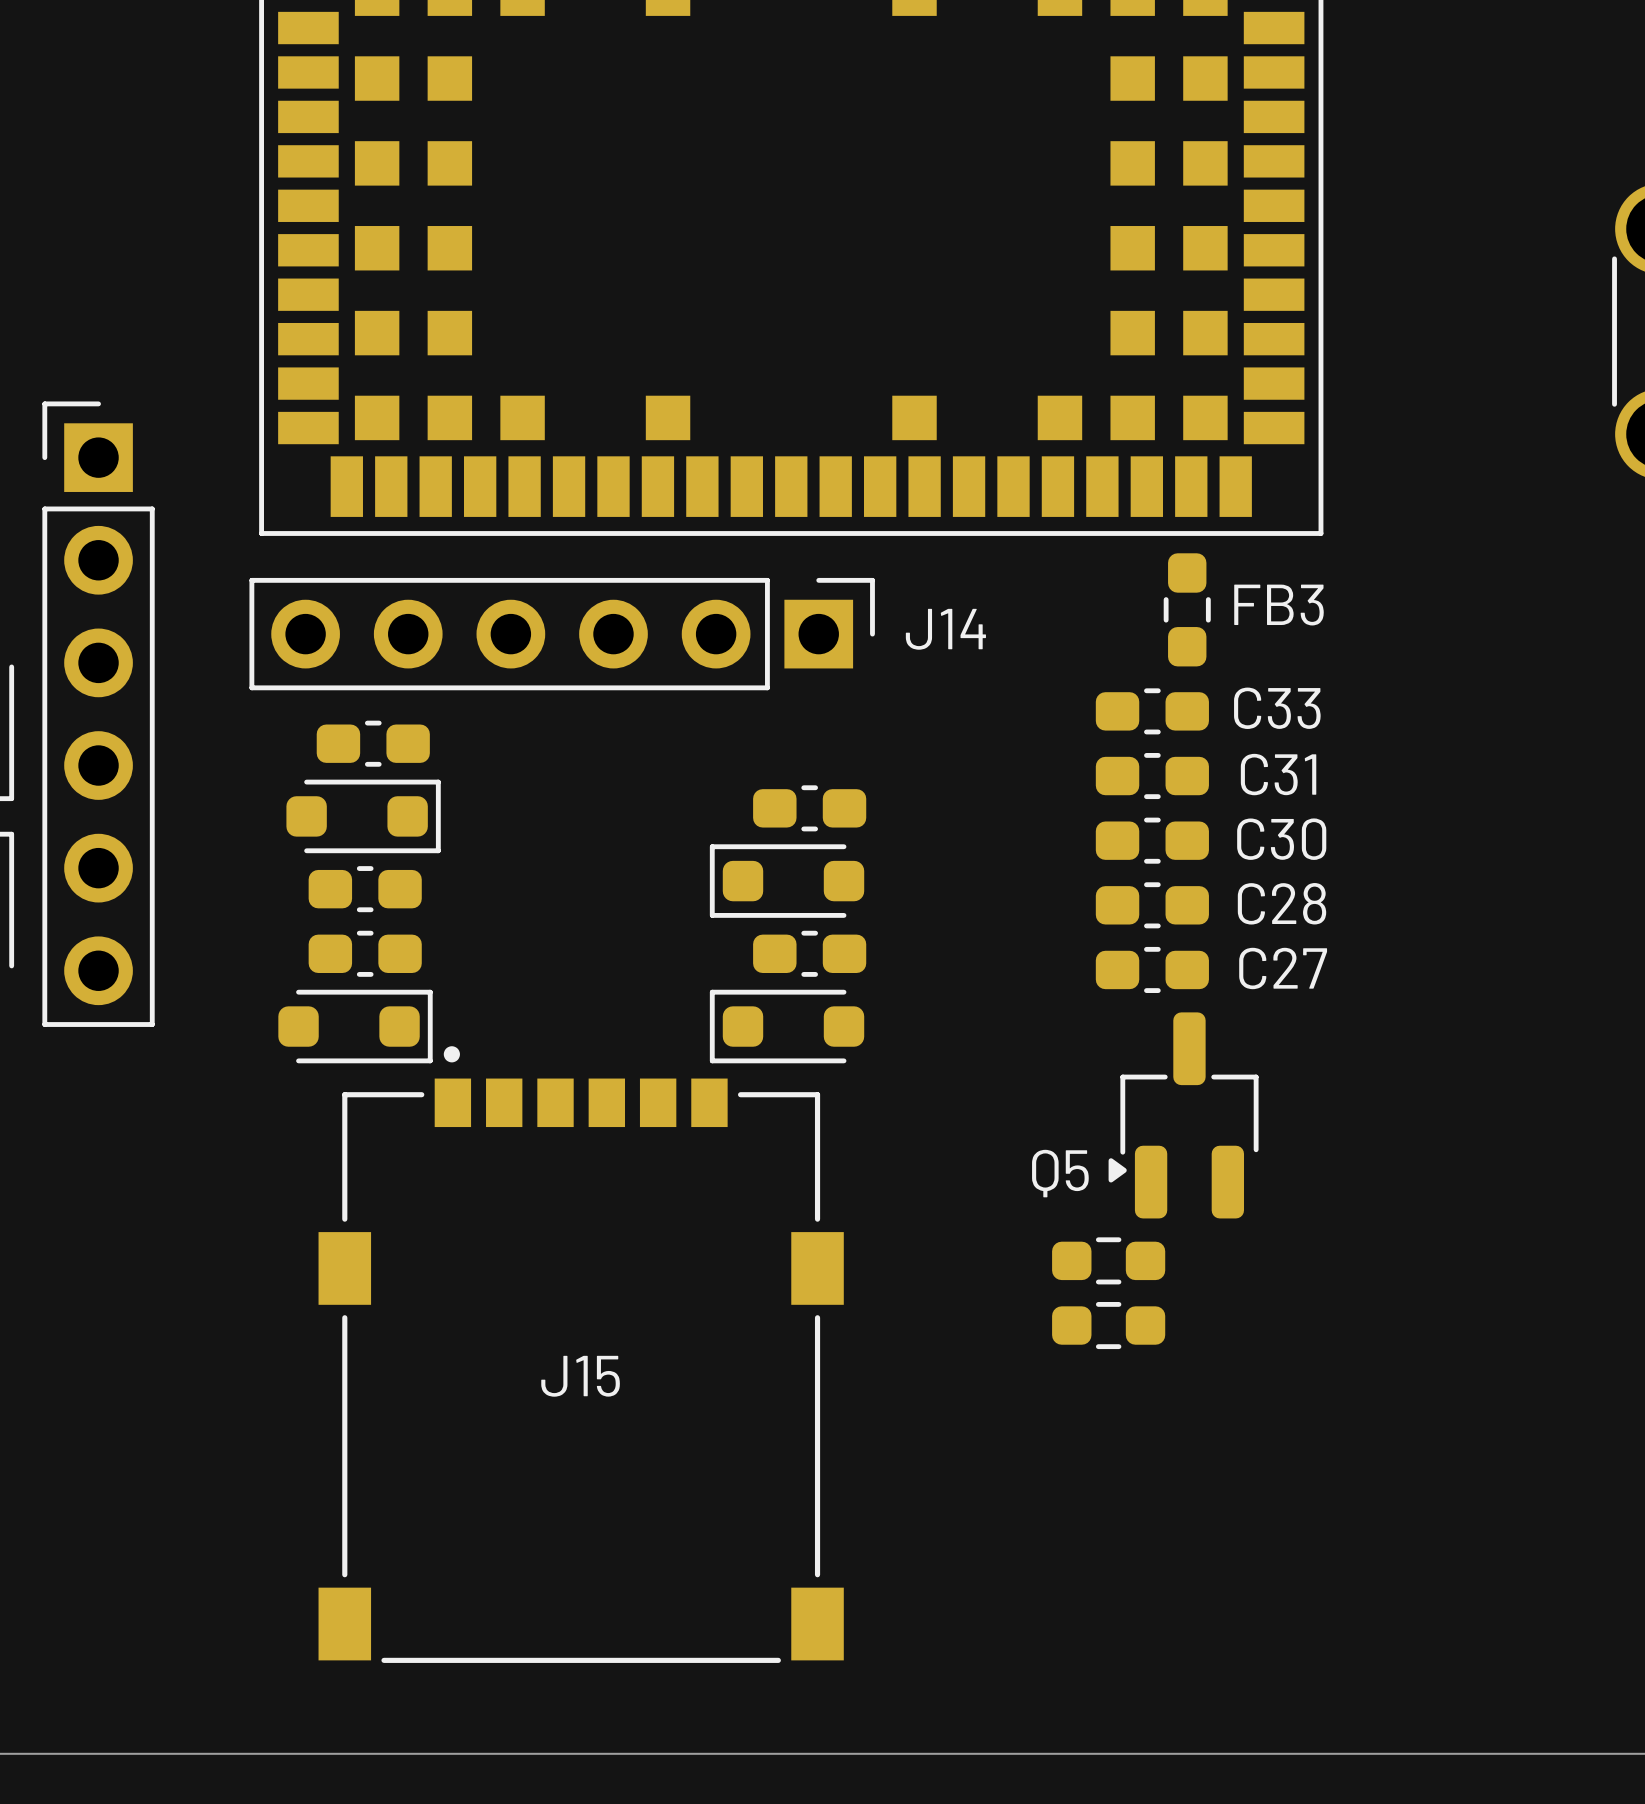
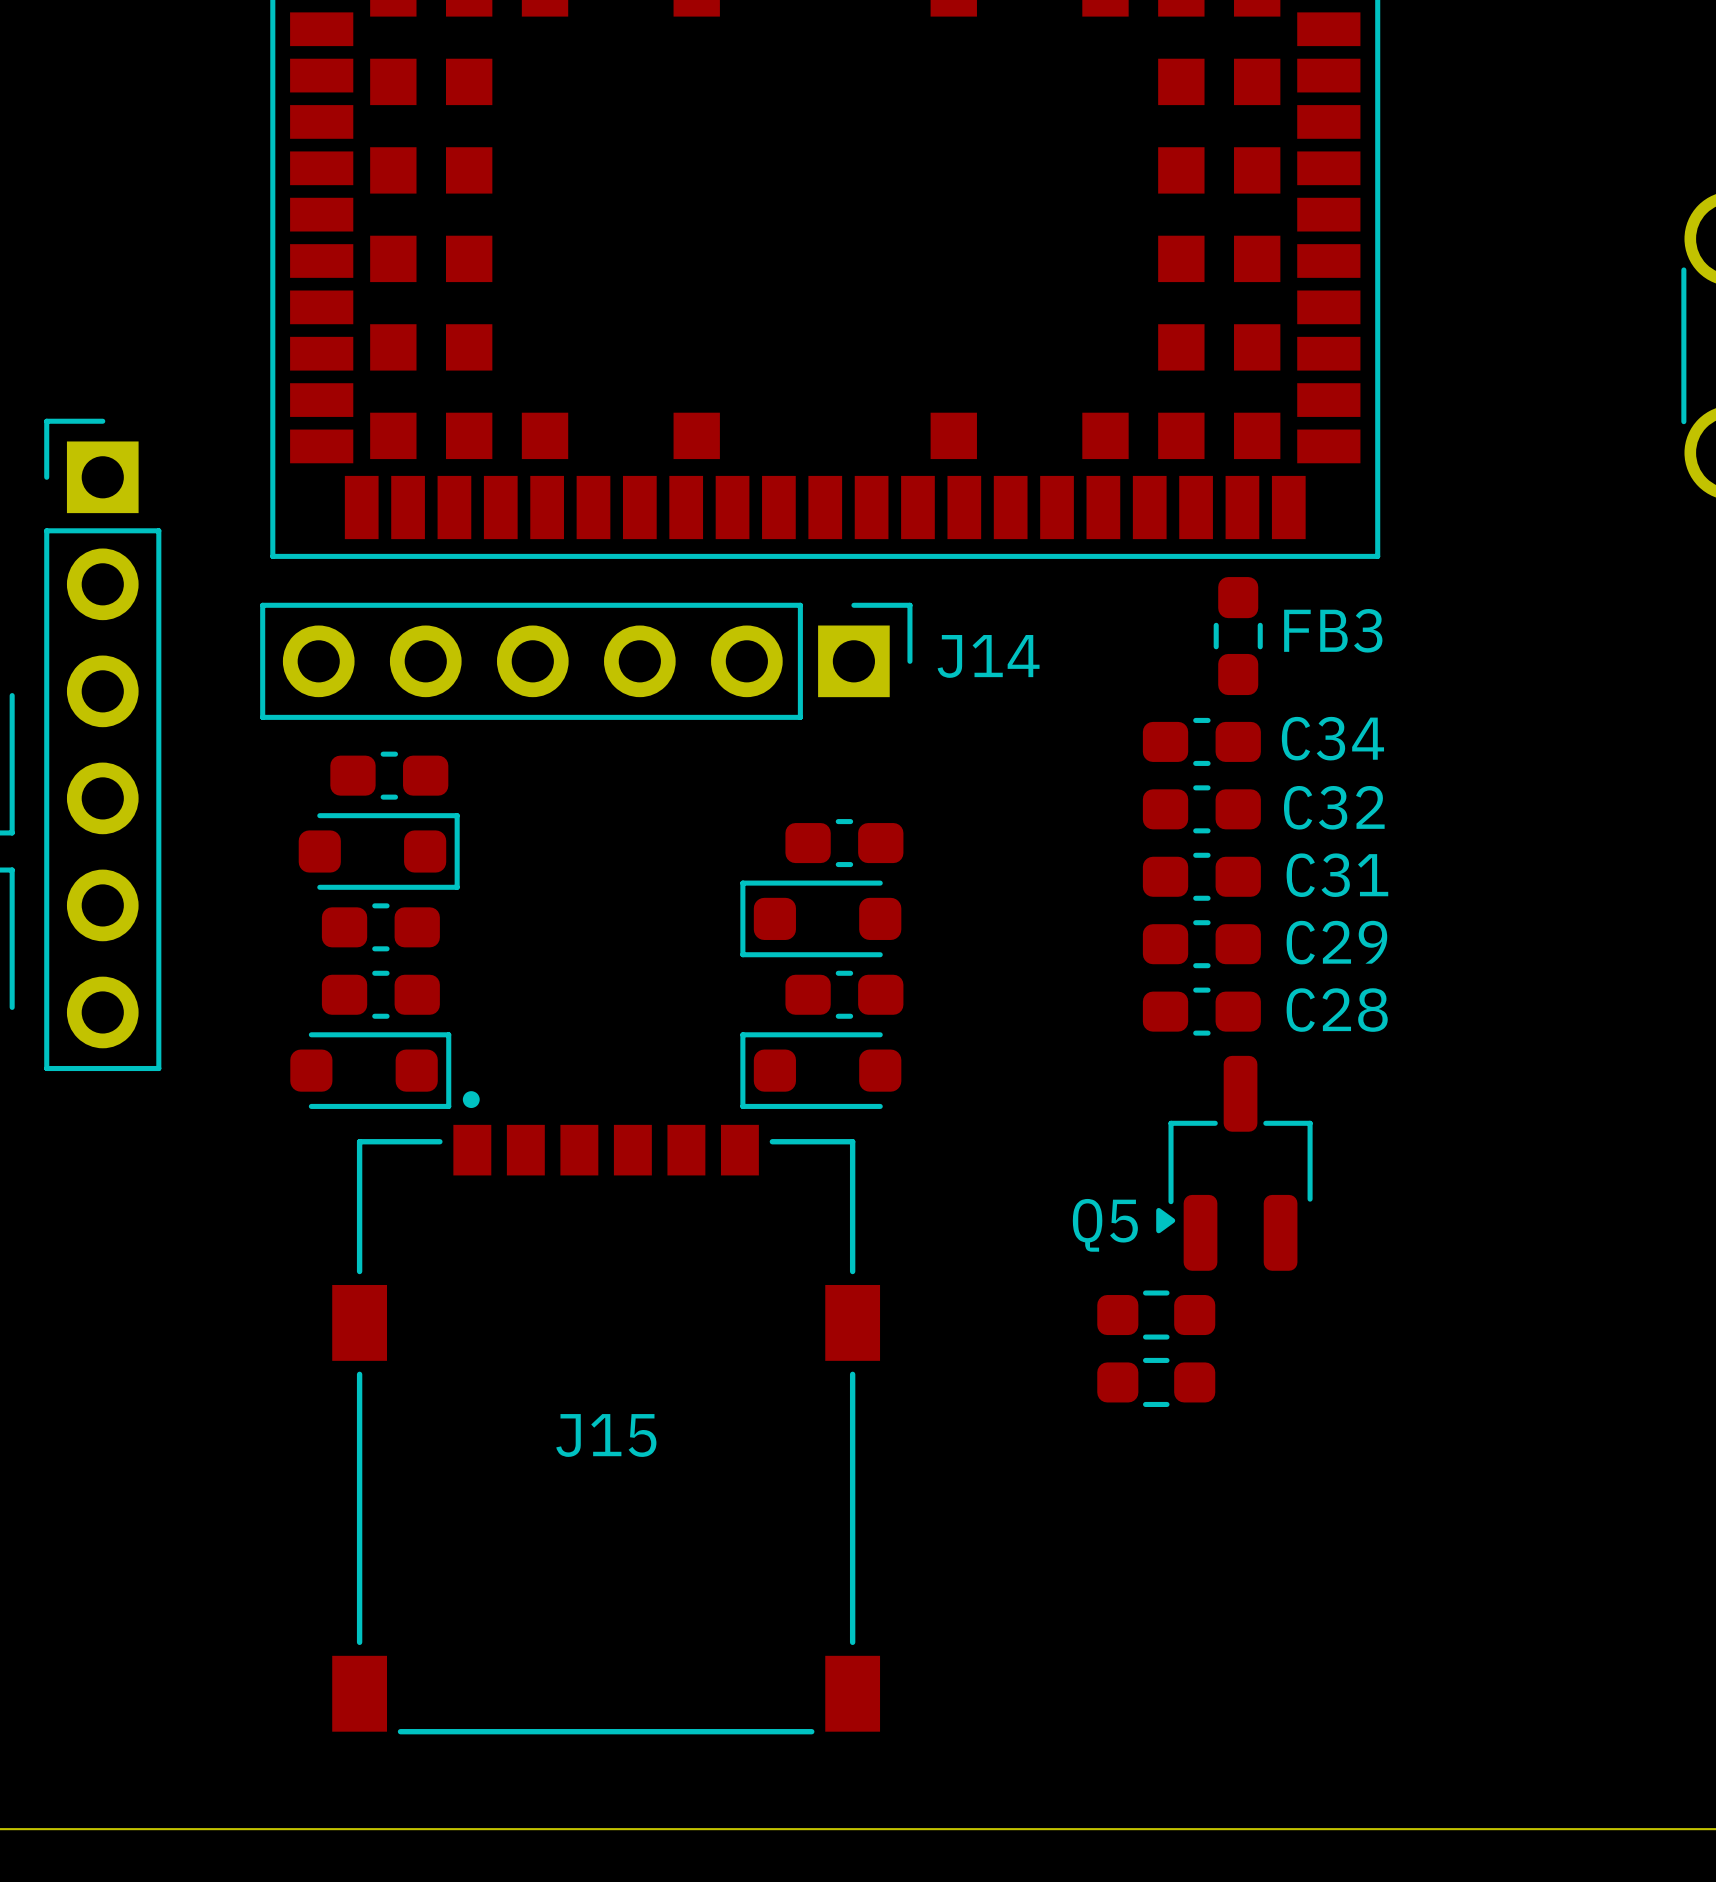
C33 name: C33 (1277, 708) -> C34 (1332, 738)
C31 name: C31 (1278, 774) -> C32 (1334, 807)
C30 name: C30 (1281, 839) -> C31 (1337, 875)
C28 name: C28 (1282, 903) -> C29 (1336, 942)
C27 name: C27 (1283, 968) -> C28 (1337, 1010)

